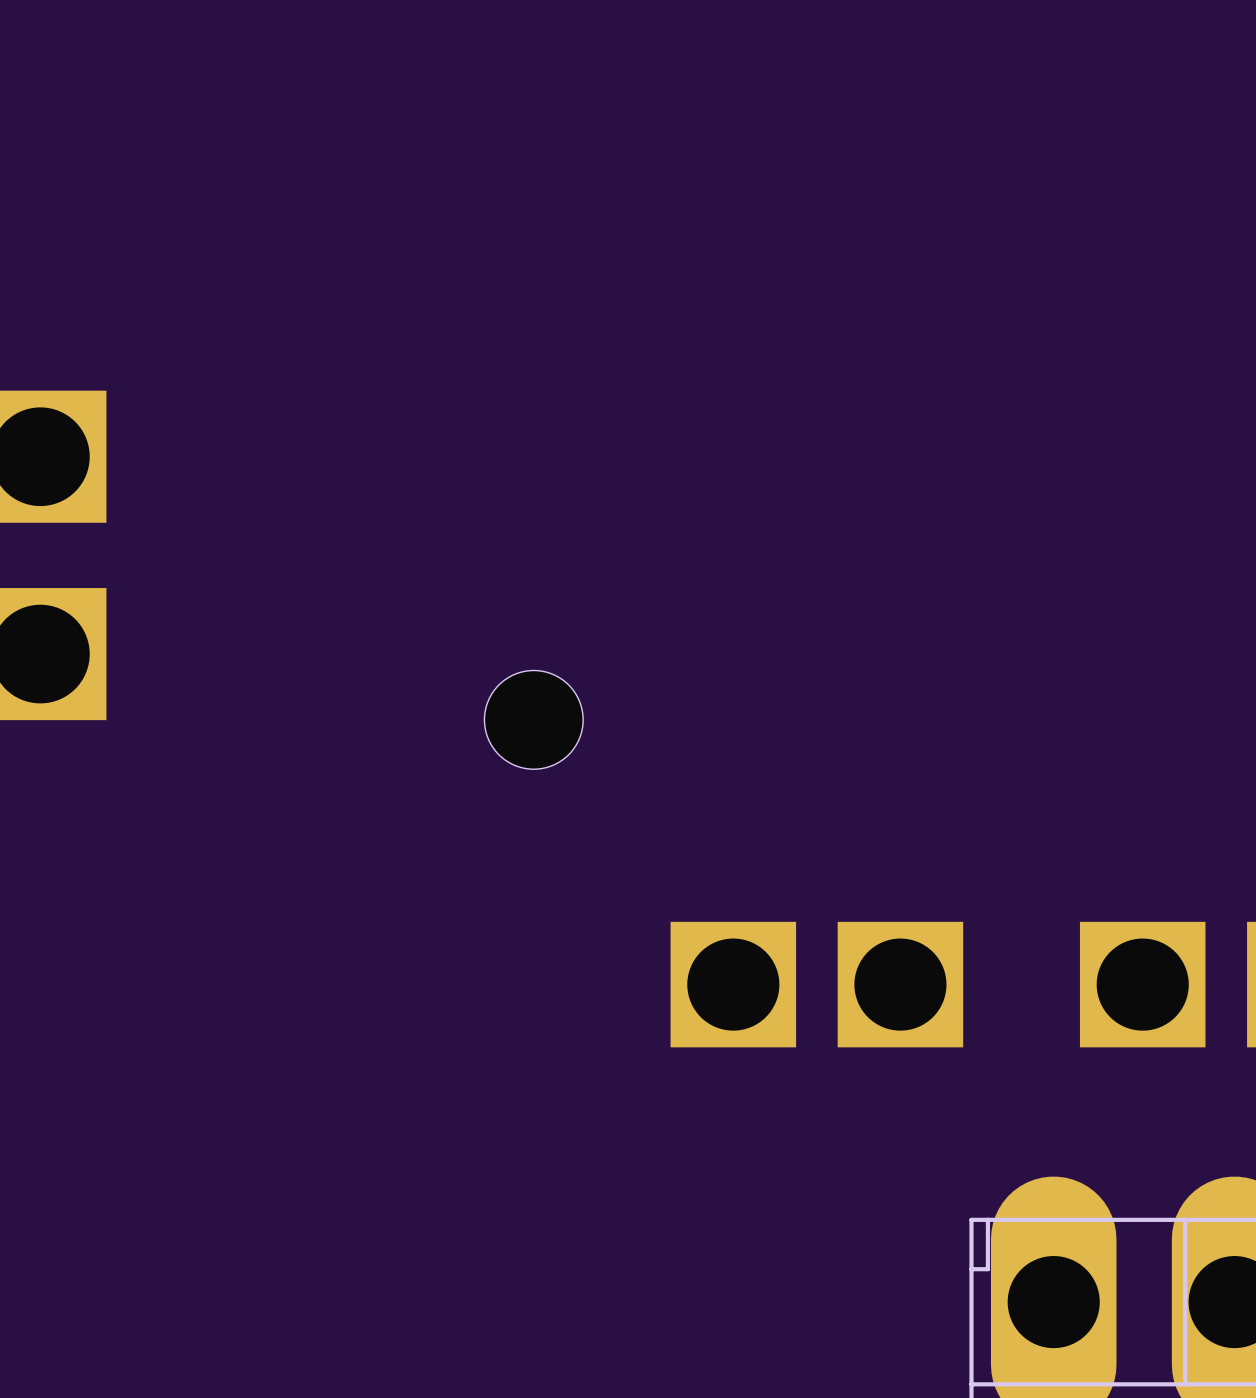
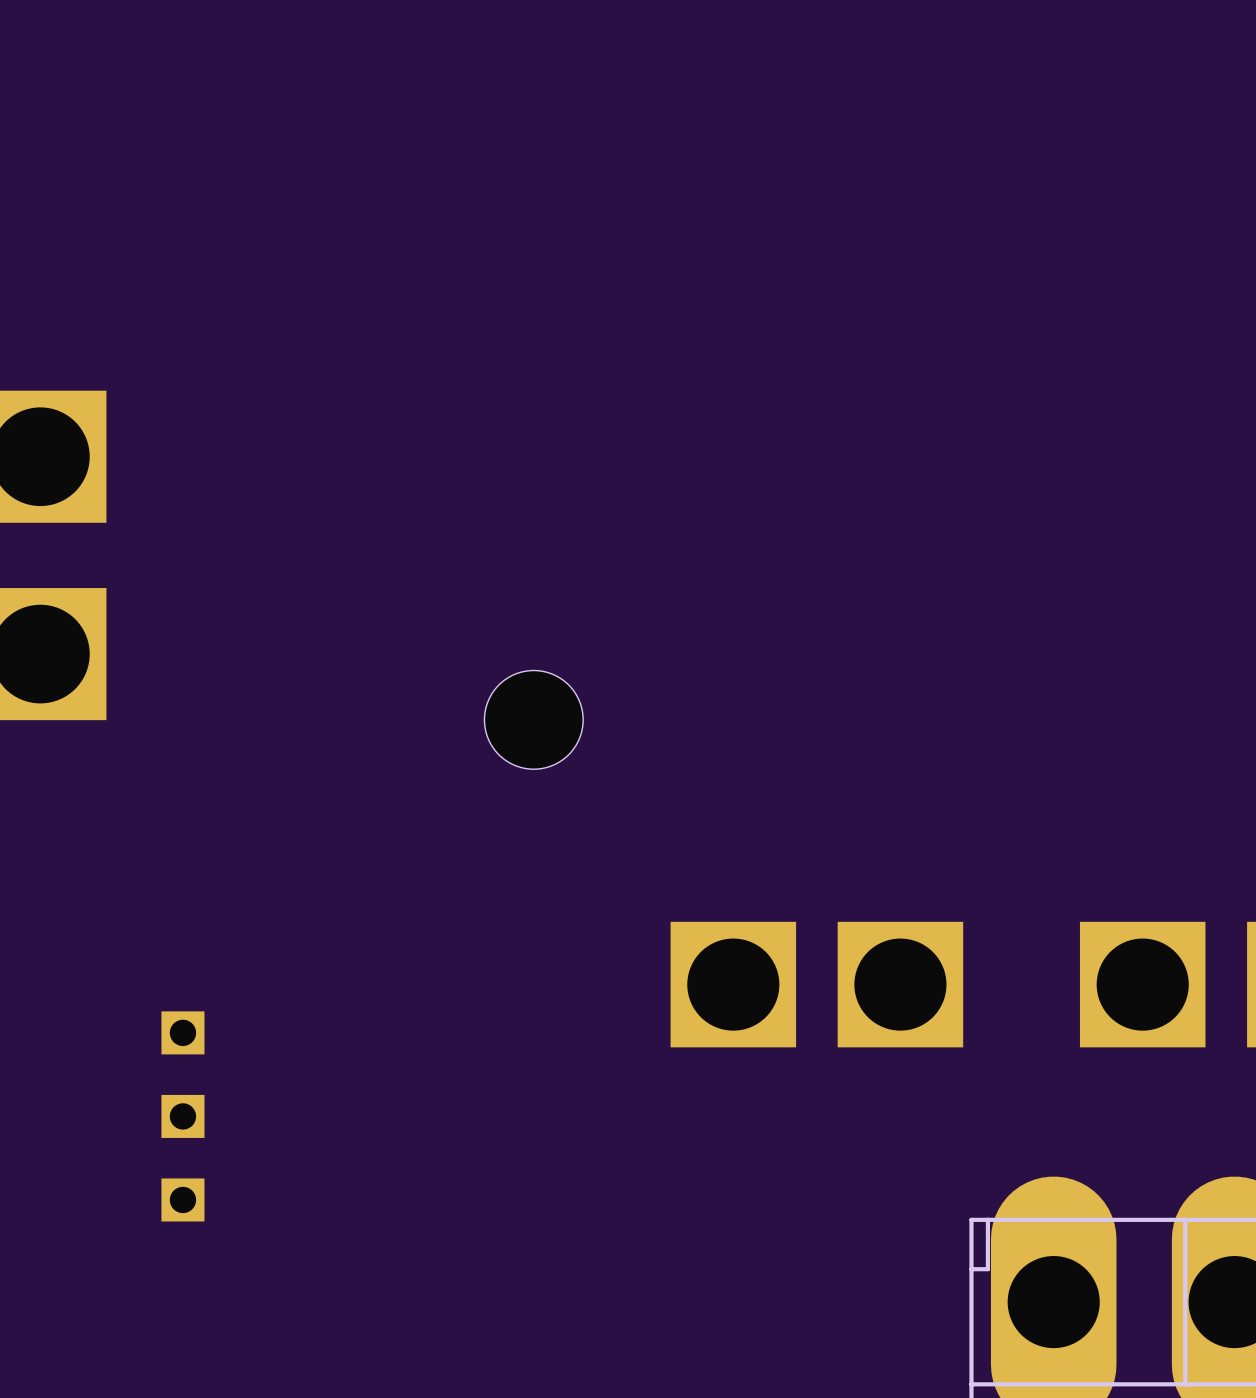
part: none -> (182, 1116)

